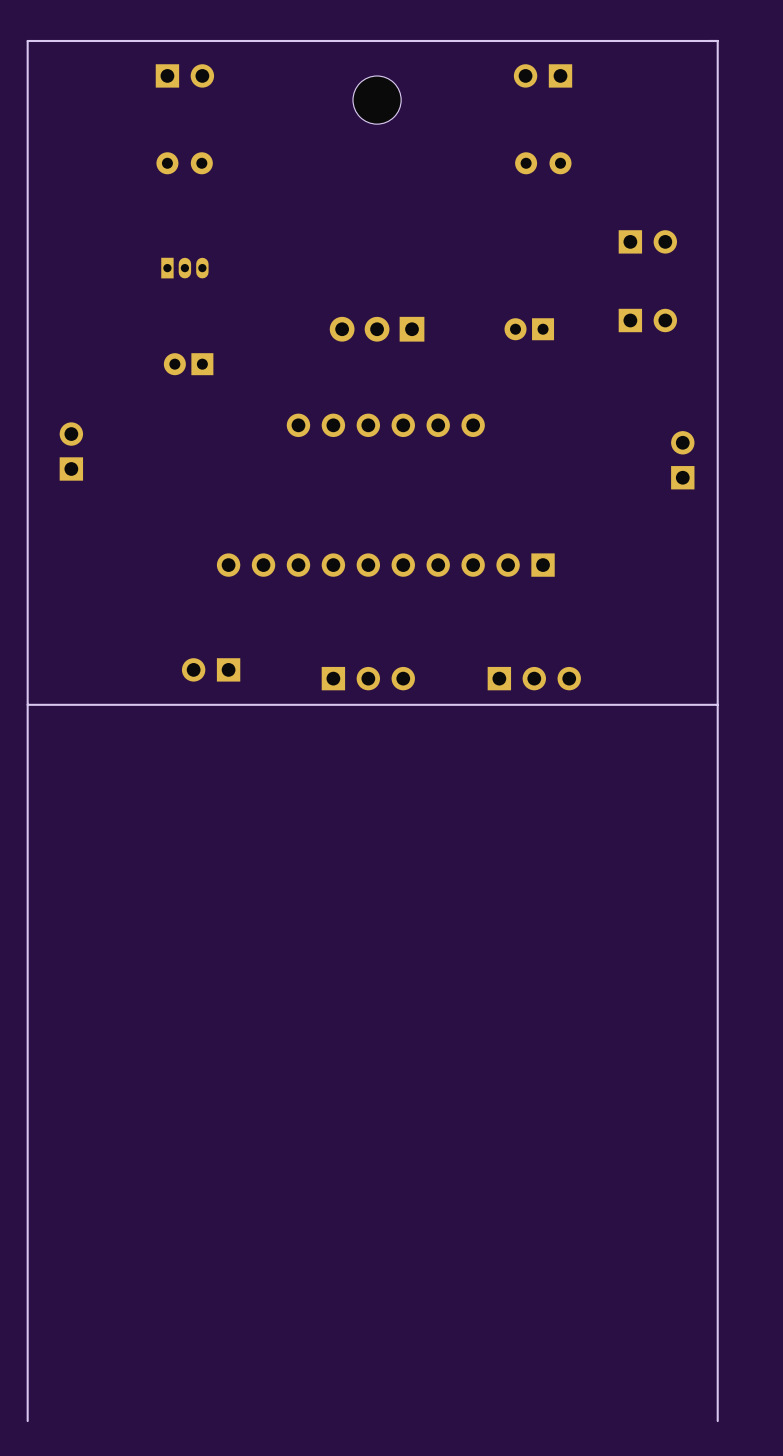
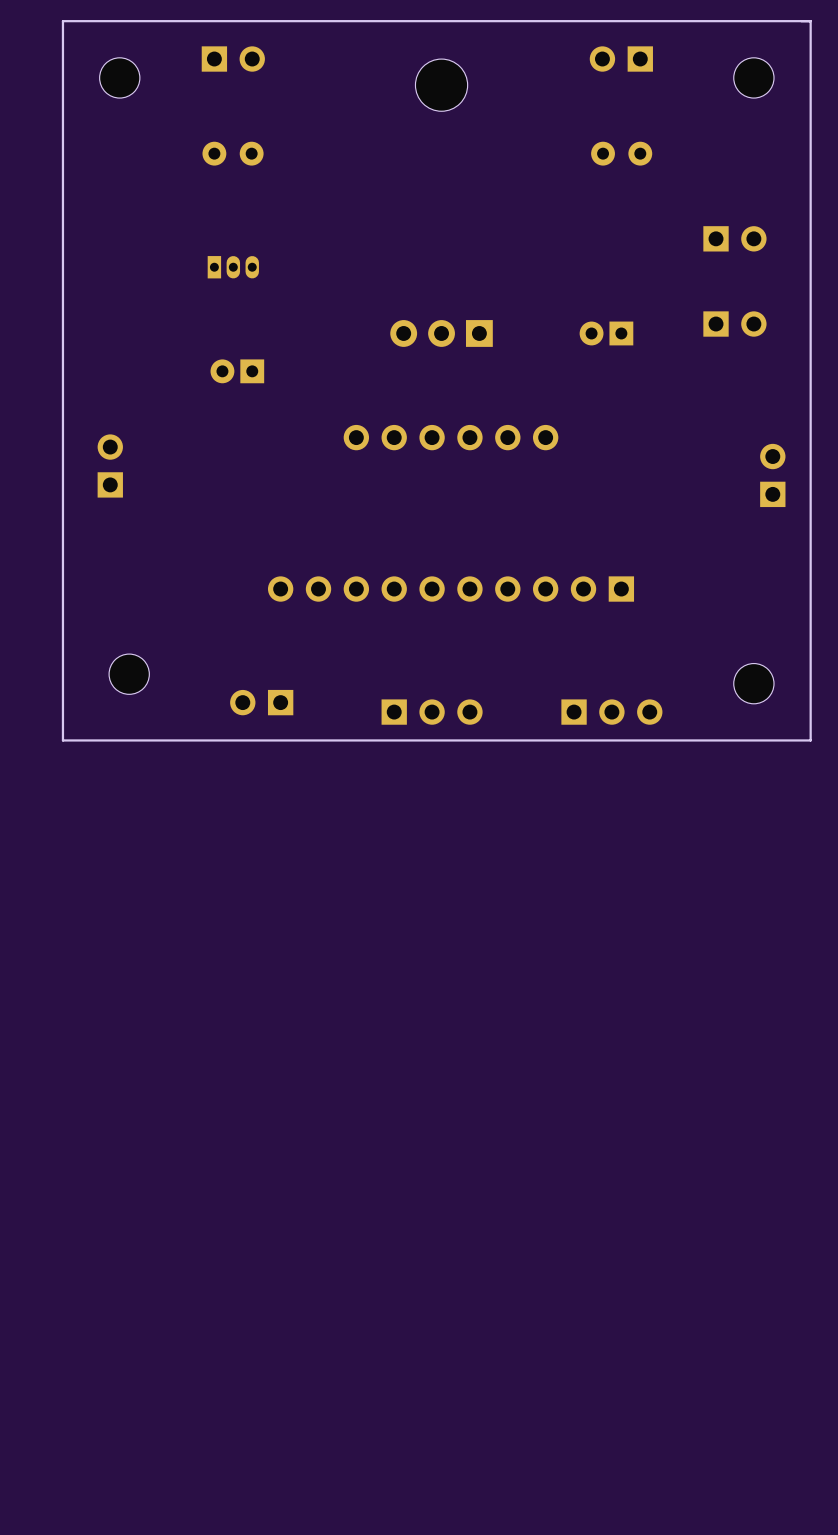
part: none -> (119, 77)
part: none -> (753, 77)
part: none -> (129, 674)
part: none -> (753, 683)
board edge: (27, 704) (27, 1421) -> none
board edge: (717, 704) (717, 1421) -> none

